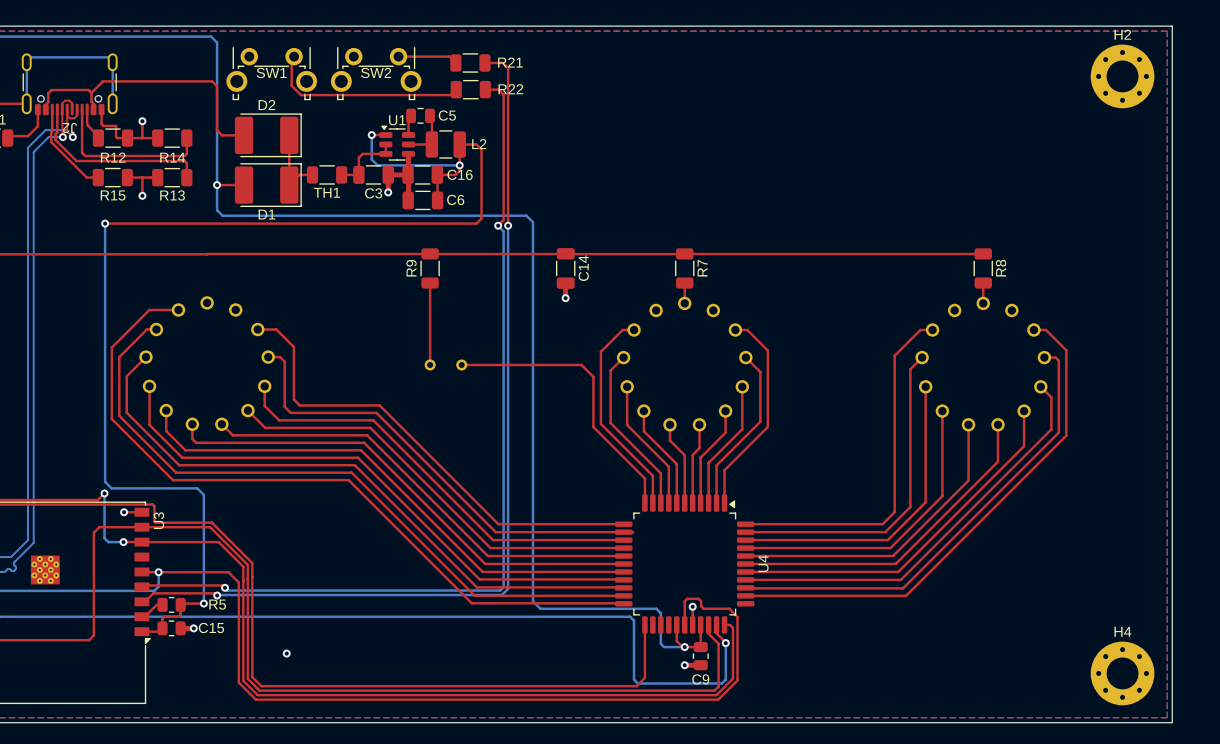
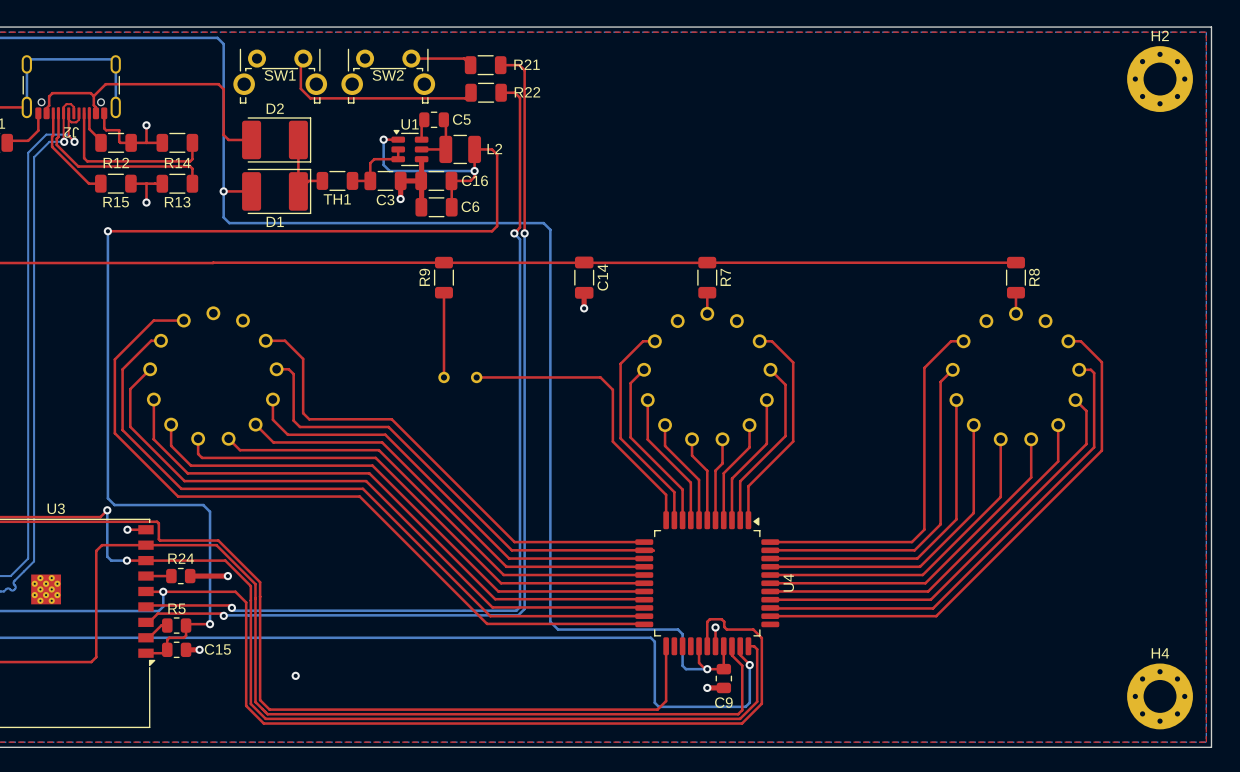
U3 name rotation: 0° (158, 520) -> 90° clockwise (56, 508)
U3 name position: U3 (158, 520) -> U3 (56, 508)
top track: none -> (146, 576) (171, 576)
R24: none -> (180, 576)
top track: none -> (190, 576) (227, 576)
via: none -> (227, 576)
R5 name position: R5 (217, 604) -> R5 (176, 608)

